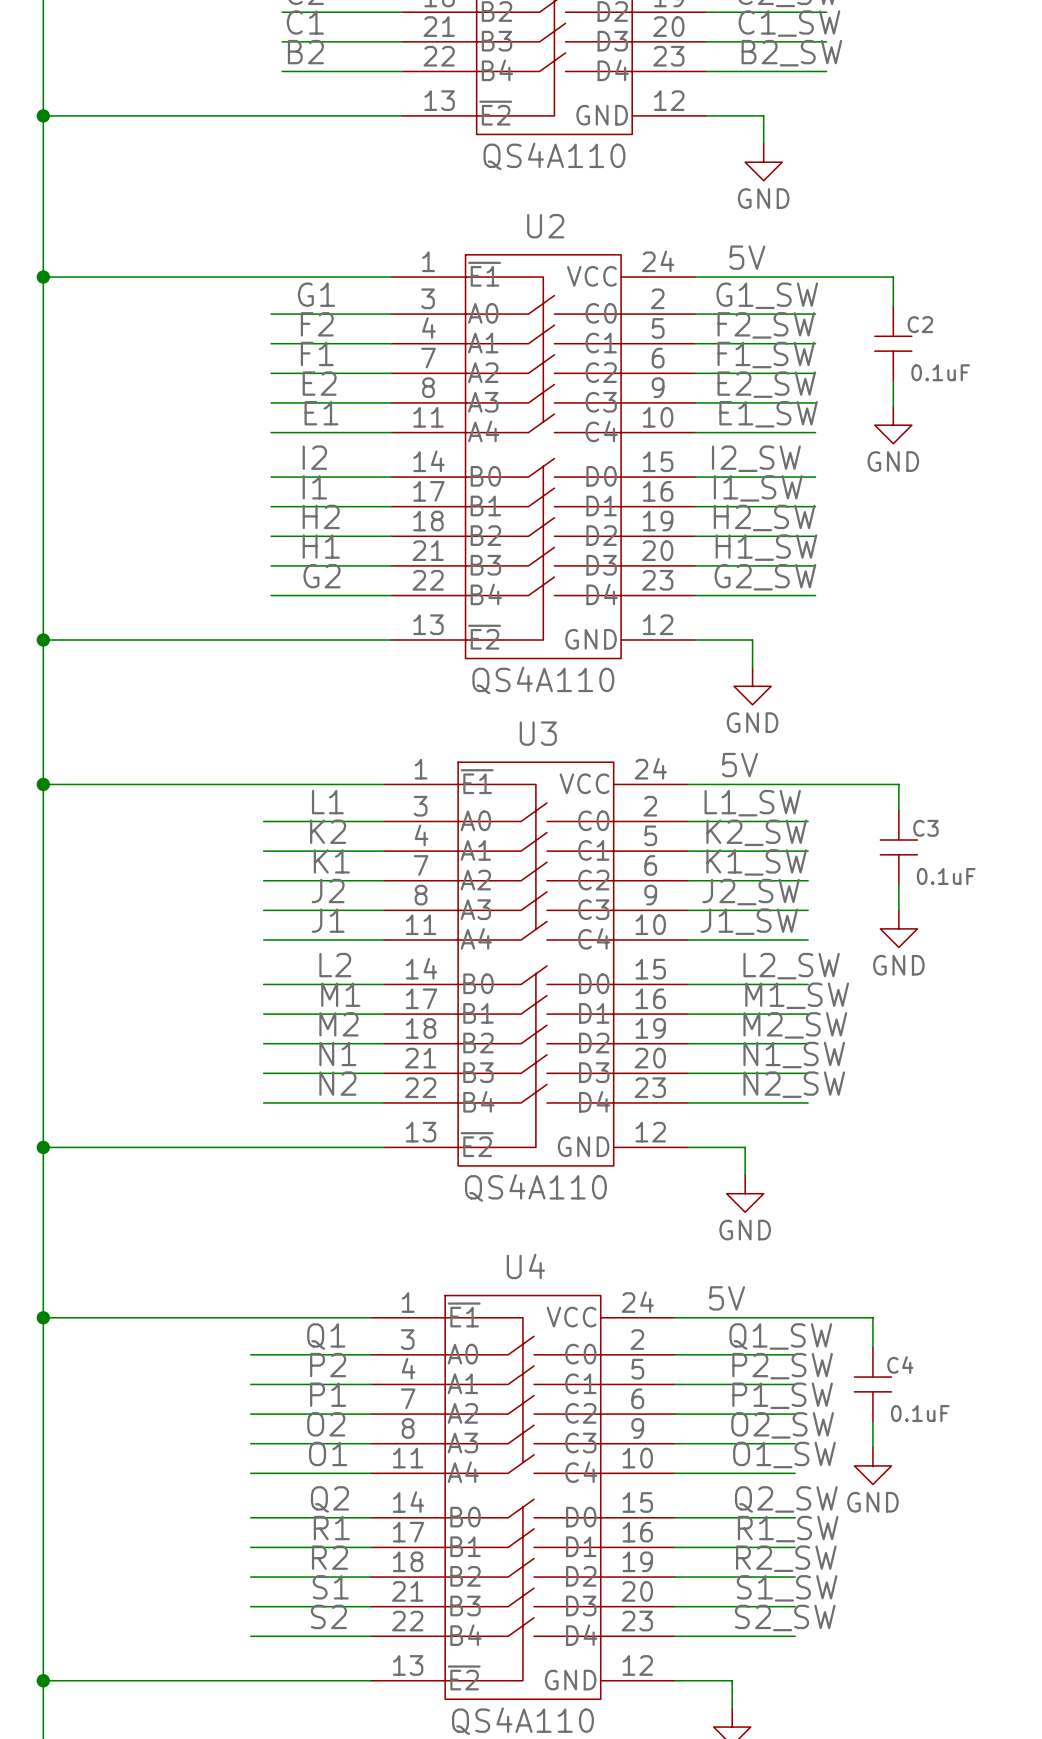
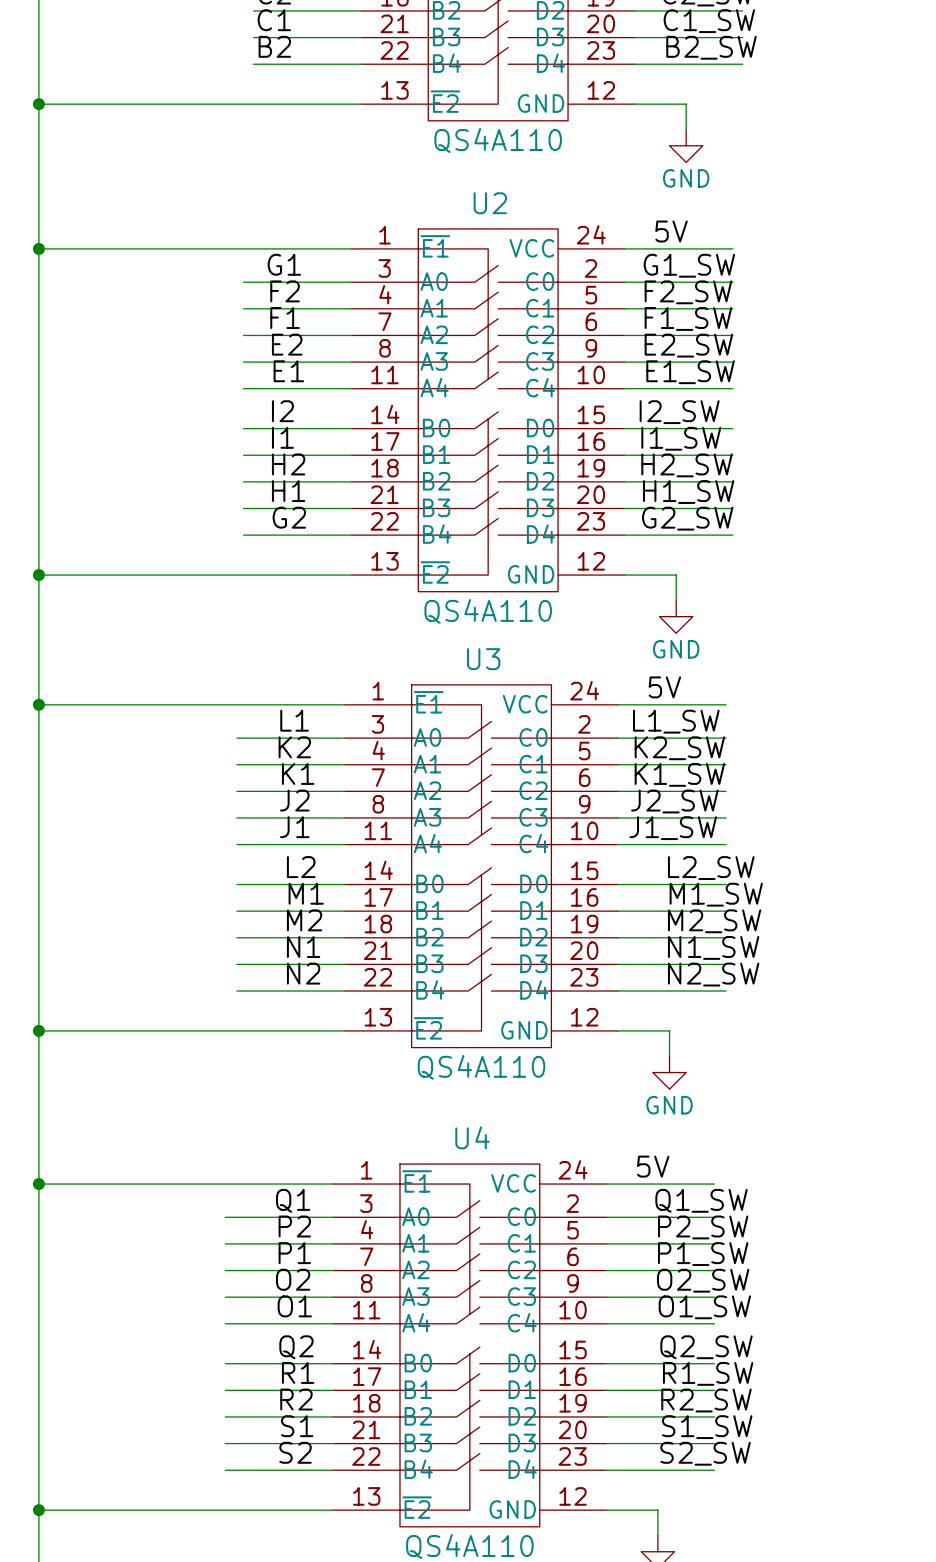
wire: (815, 277) (893, 277) (893, 306) -> none
C2: 0.1uF (893, 343) -> none
wire: (893, 380) (893, 406) -> none
power symbol: GND (893, 425) -> none
wire: (808, 784) (898, 784) (898, 810) -> none
C3: 0.1uF (898, 847) -> none
wire: (898, 884) (898, 910) -> none
power symbol: GND (898, 928) -> none
wire: (795, 1317) (872, 1317) (872, 1347) -> none
C4: 0.1uF (872, 1384) -> none
wire: (872, 1421) (872, 1447) -> none
power symbol: GND (872, 1465) -> none

